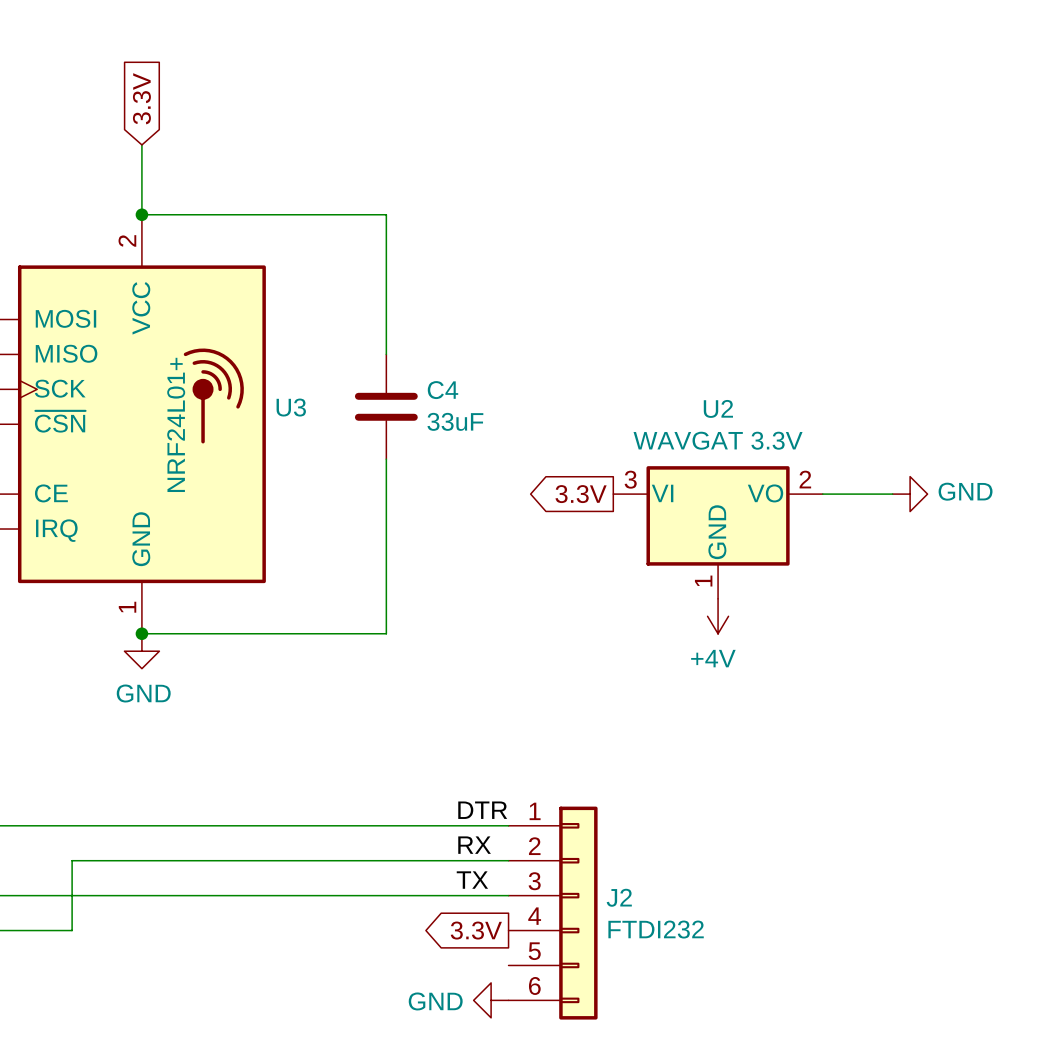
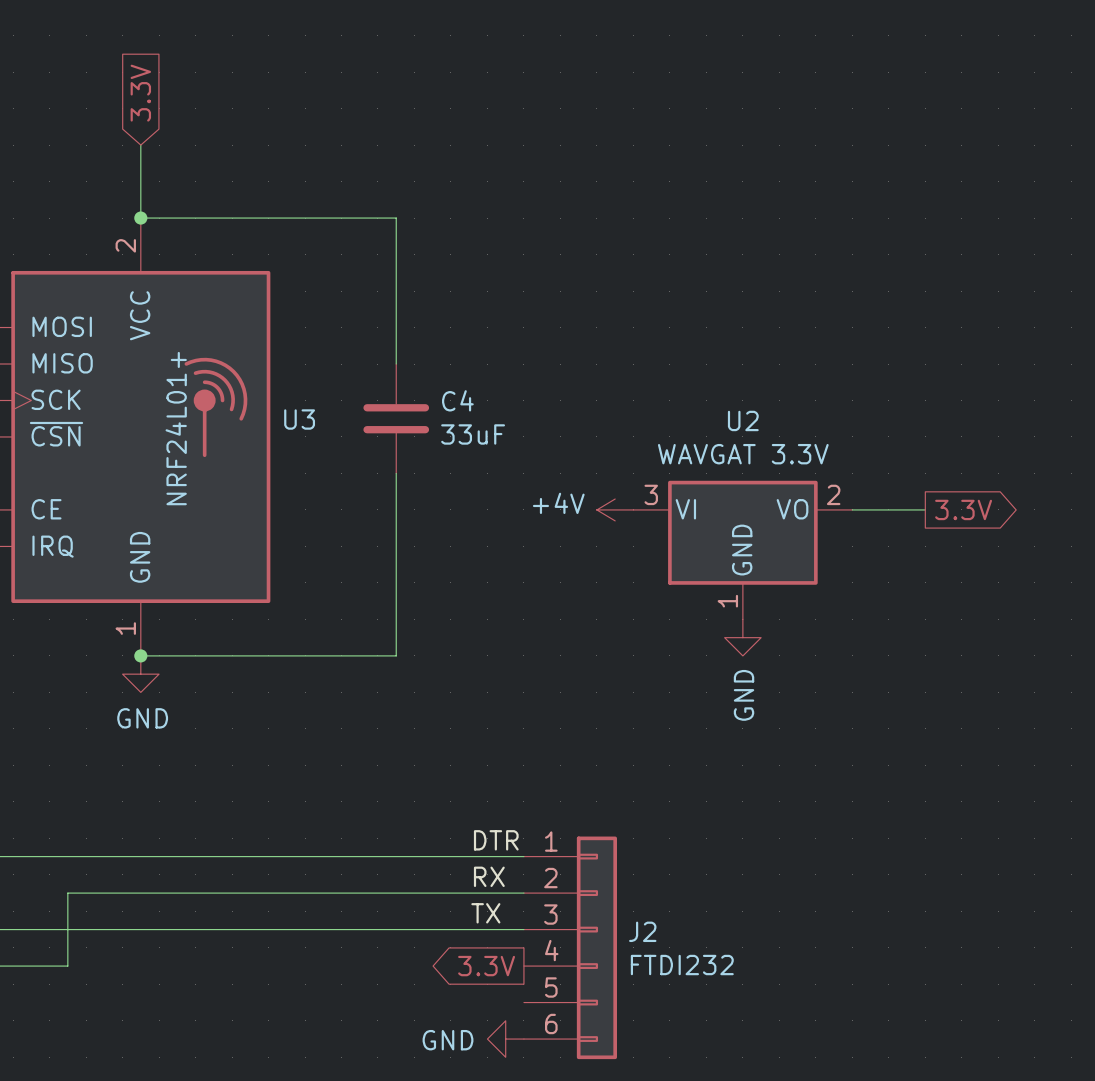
global label rotation: 0° (581, 494) -> 180° (963, 509)
global label position: 3.3V (581, 494) -> 3.3V (963, 509)
power symbol: none -> +4V (615, 509)
power symbol: GND (910, 494) -> none
power symbol: +4V (718, 616) -> GND (742, 637)

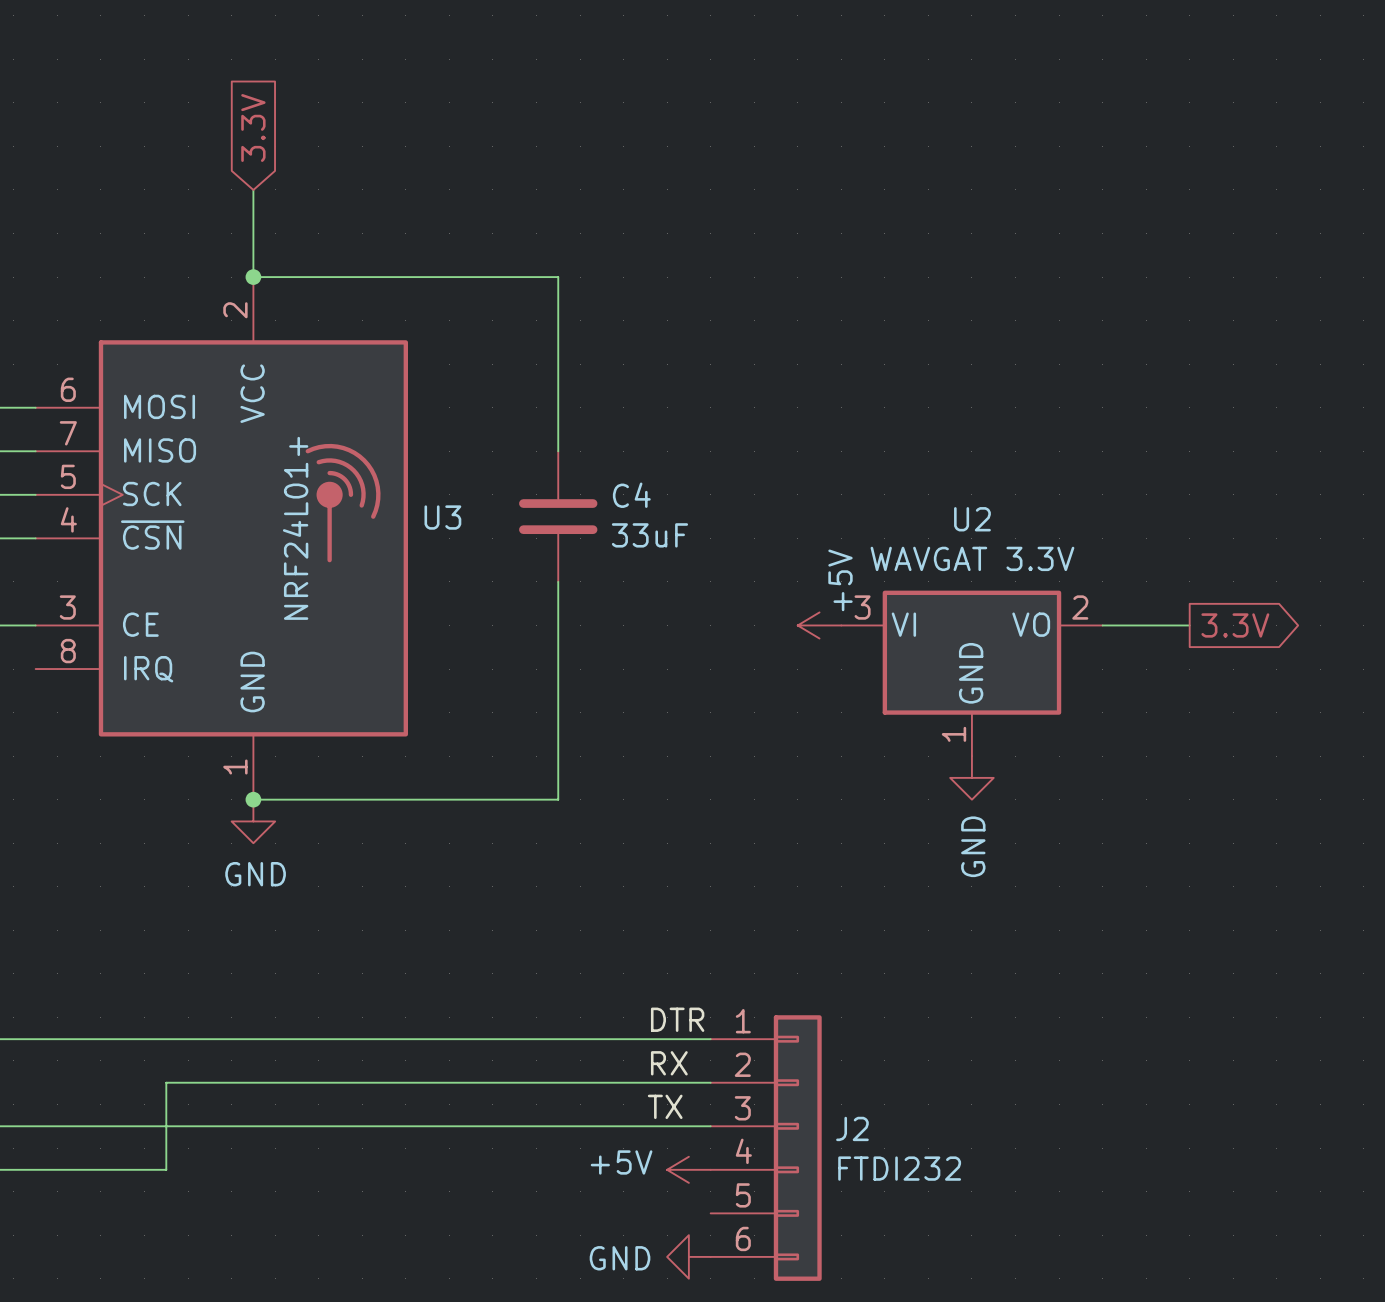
power symbol: +4V (615, 509) -> +5V (819, 625)
global label: 3.3V (486, 966) -> none
power symbol: none -> +5V (688, 1169)

